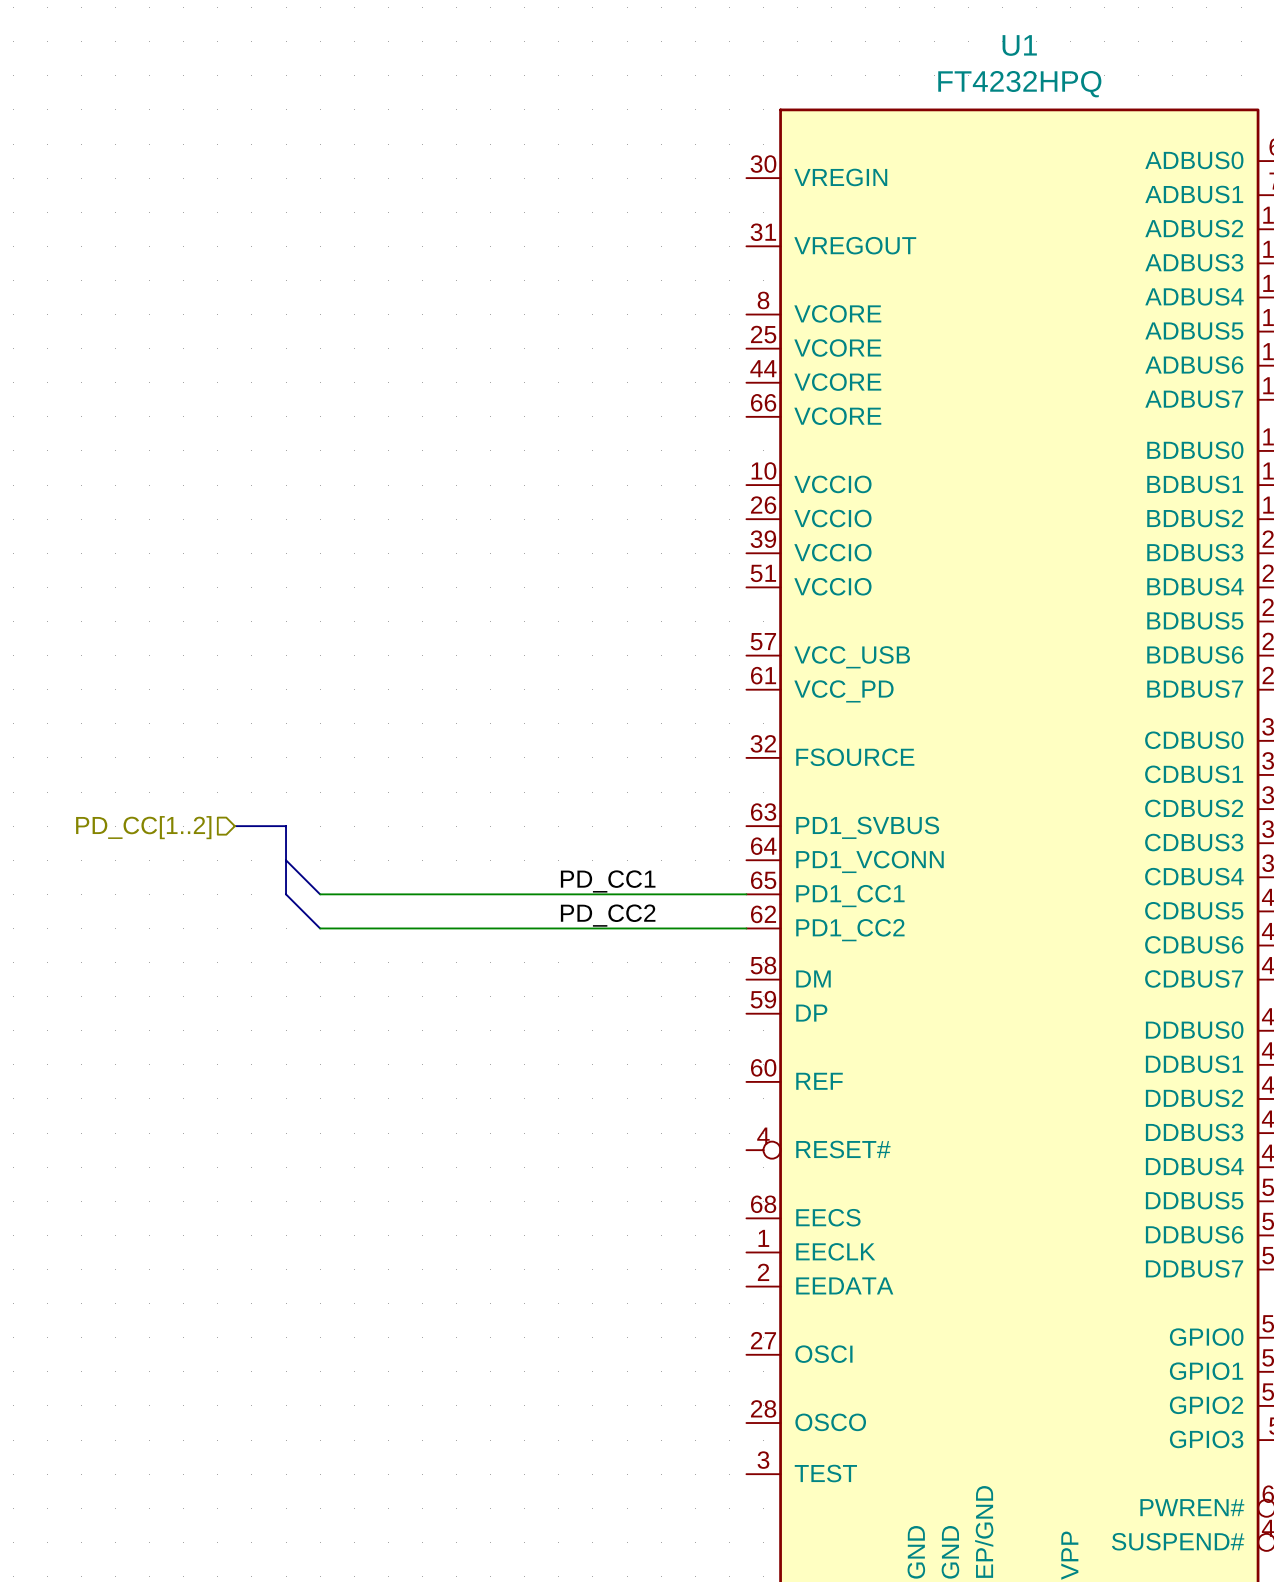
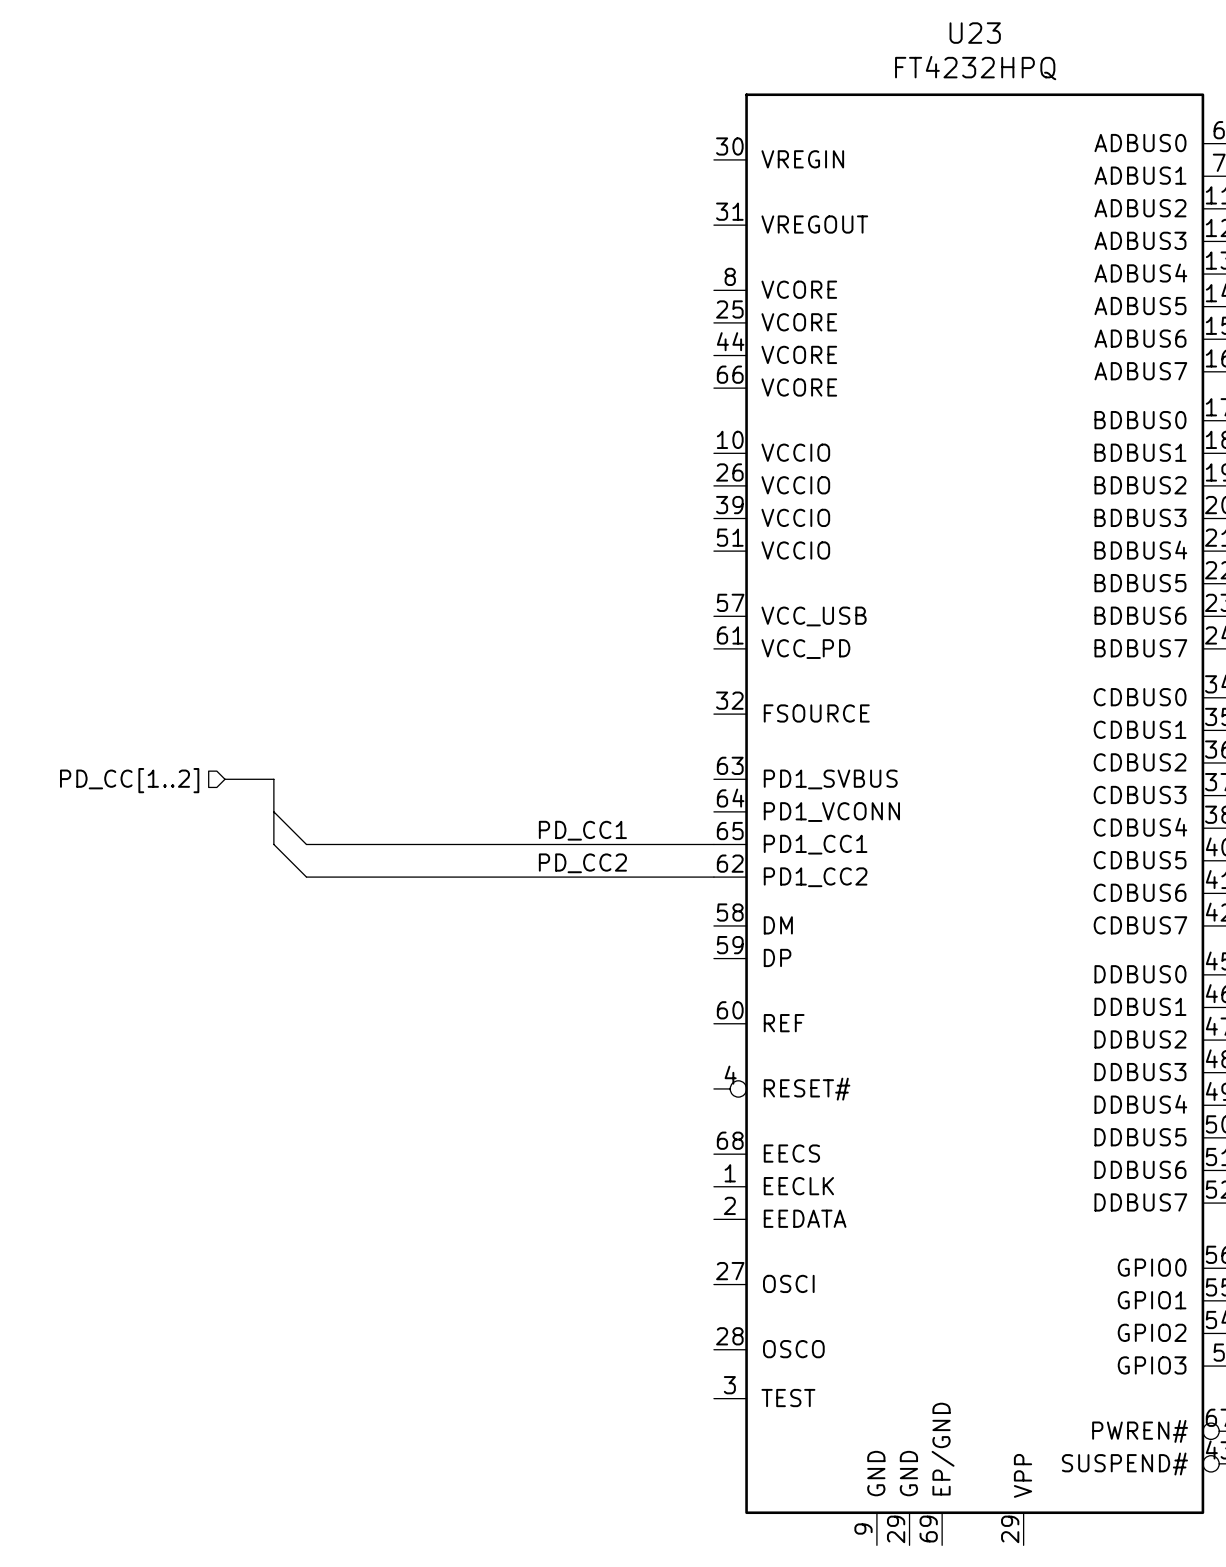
U1 name: U1 (1019, 45) -> U23 (975, 33)

